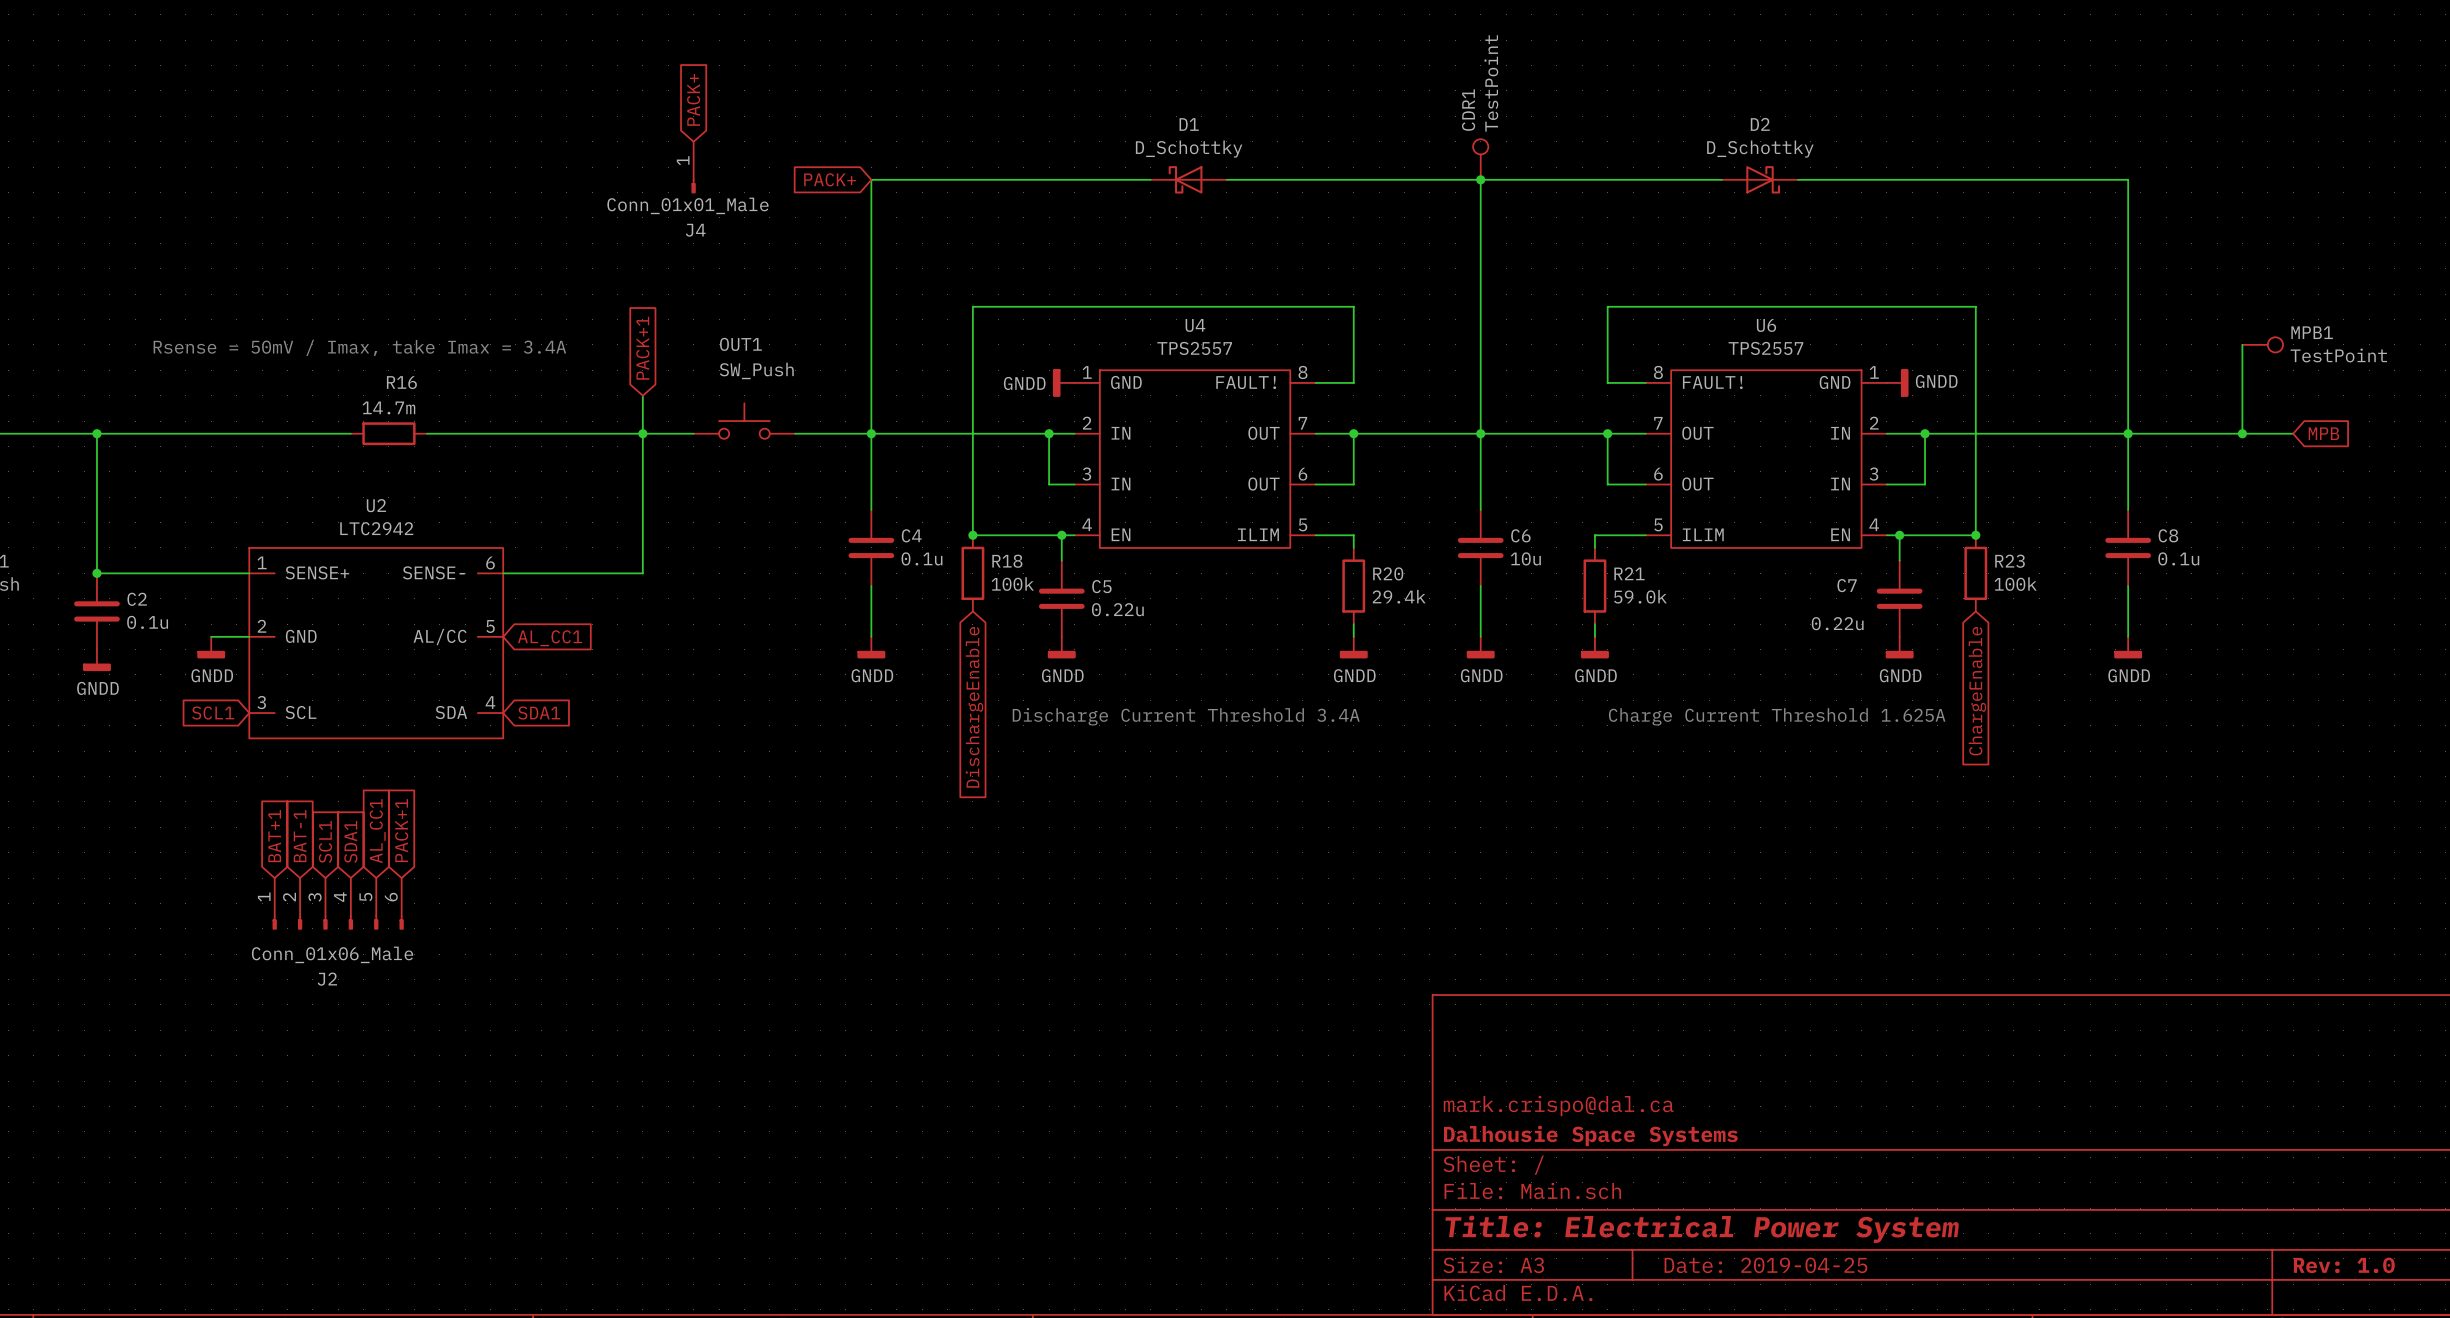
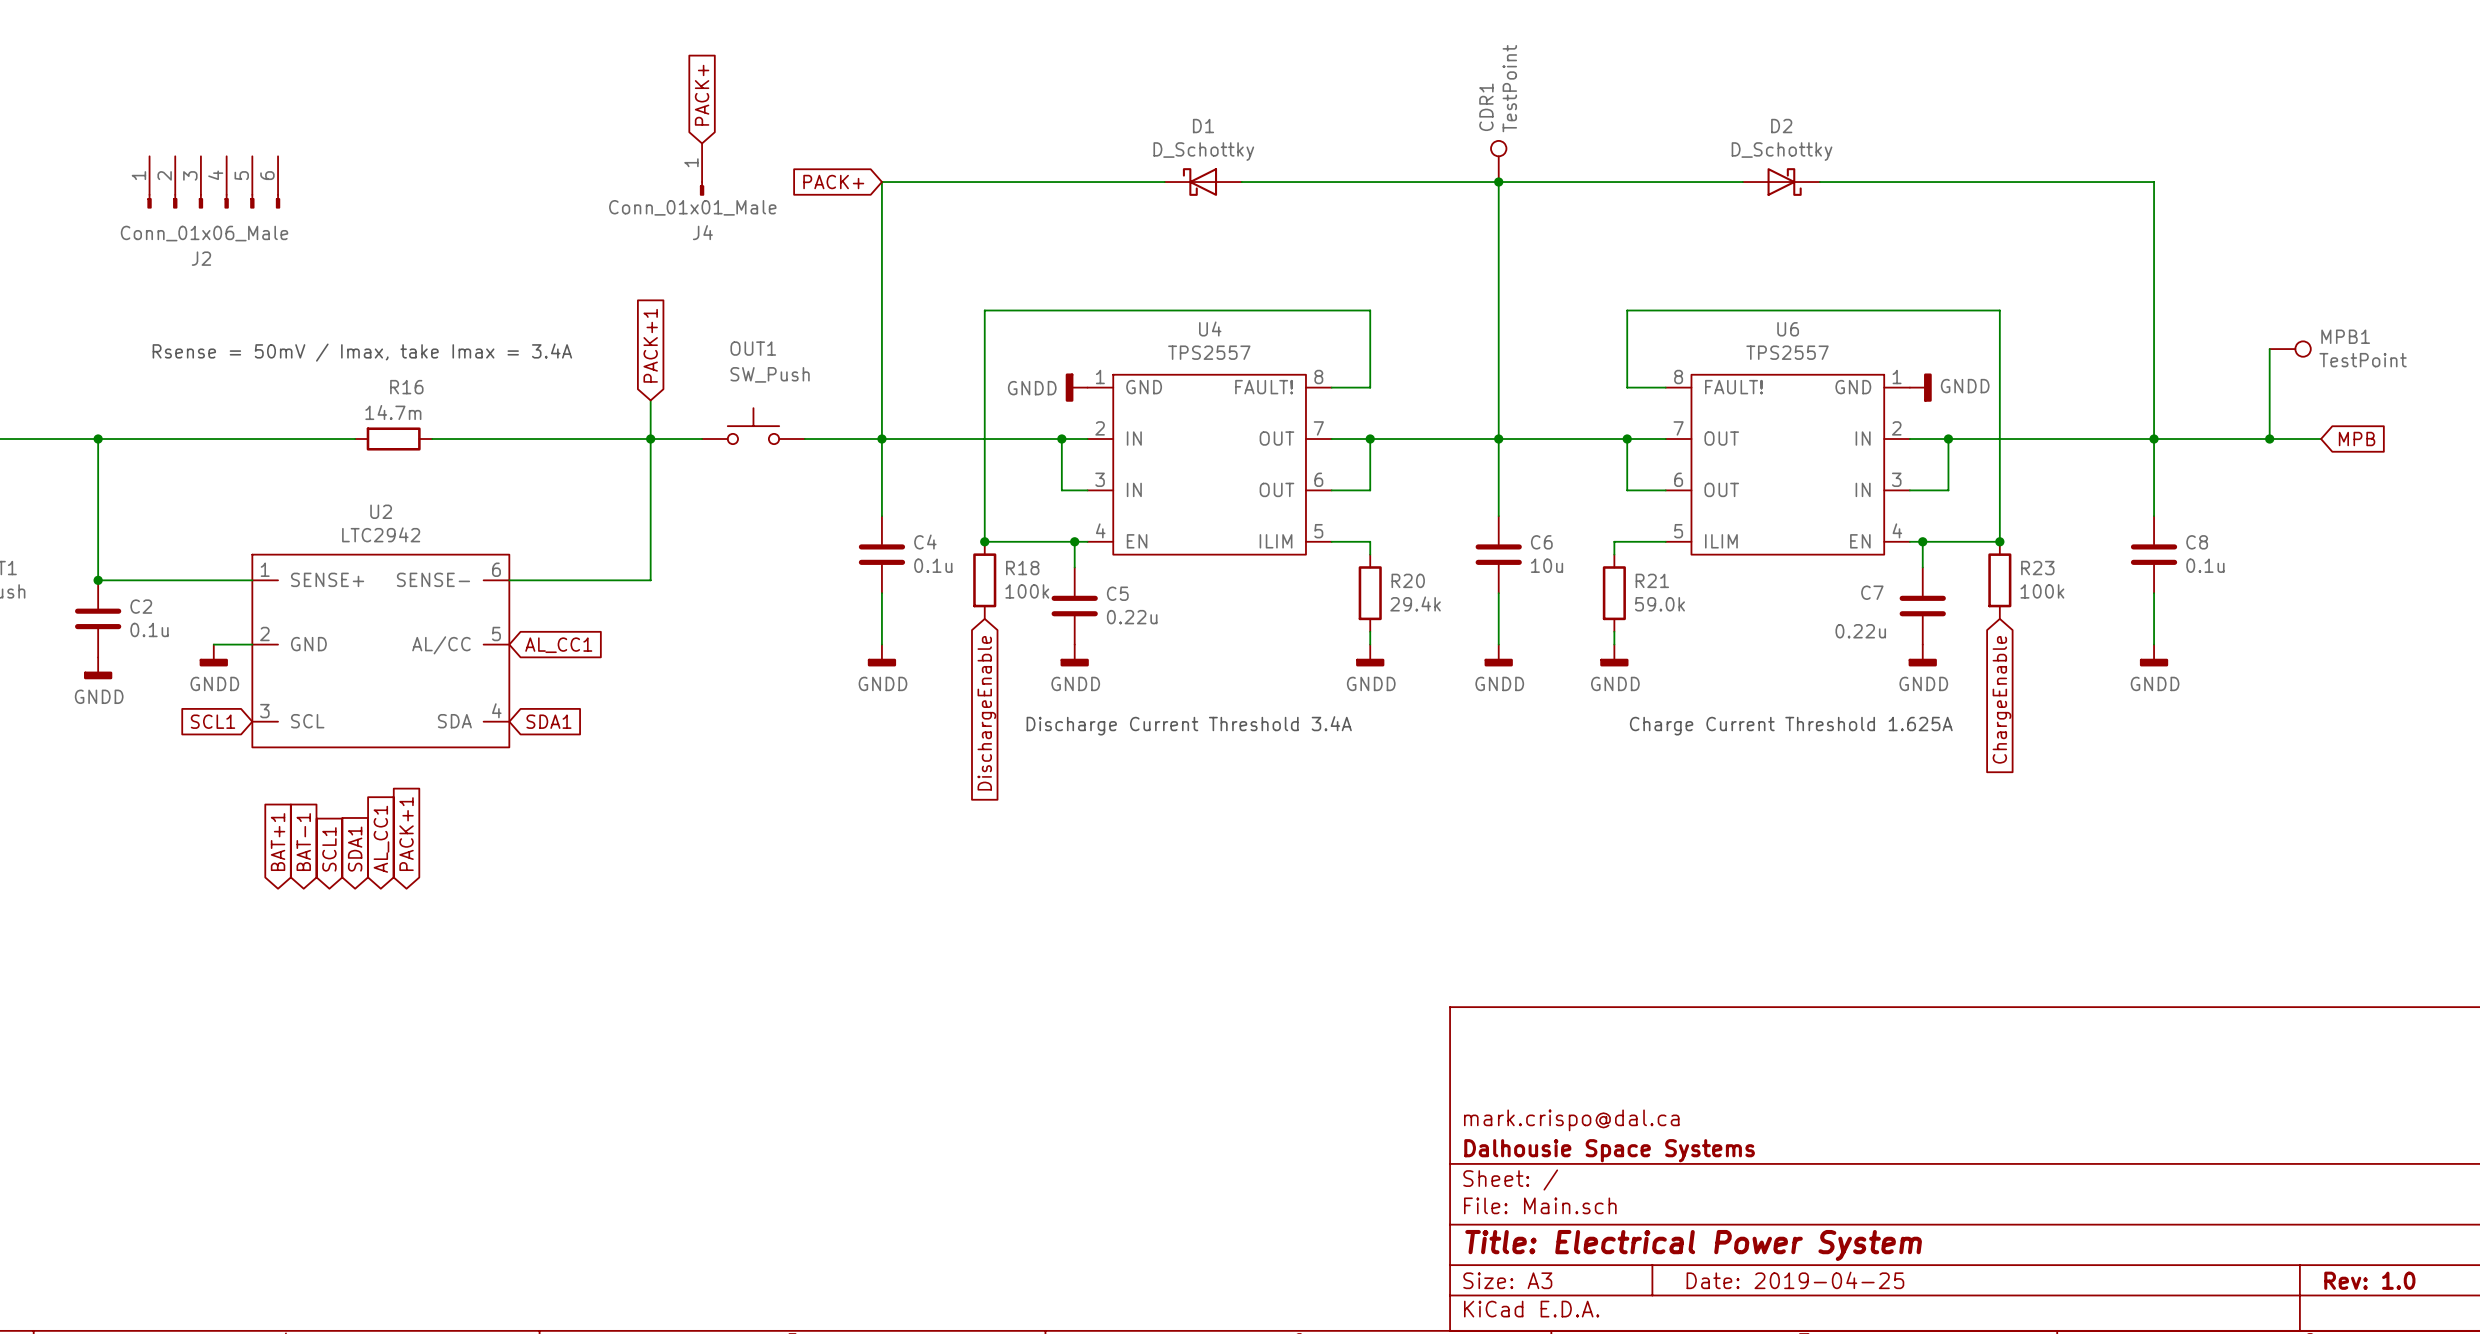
J2 position: (338, 903) -> (213, 182)

